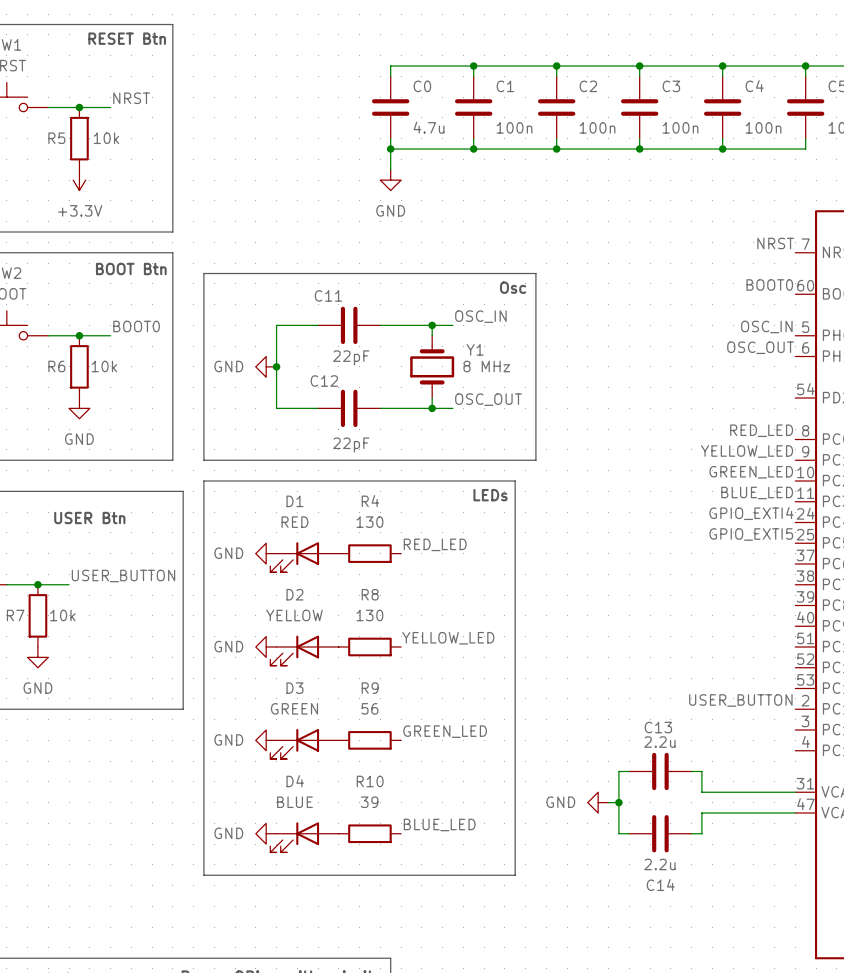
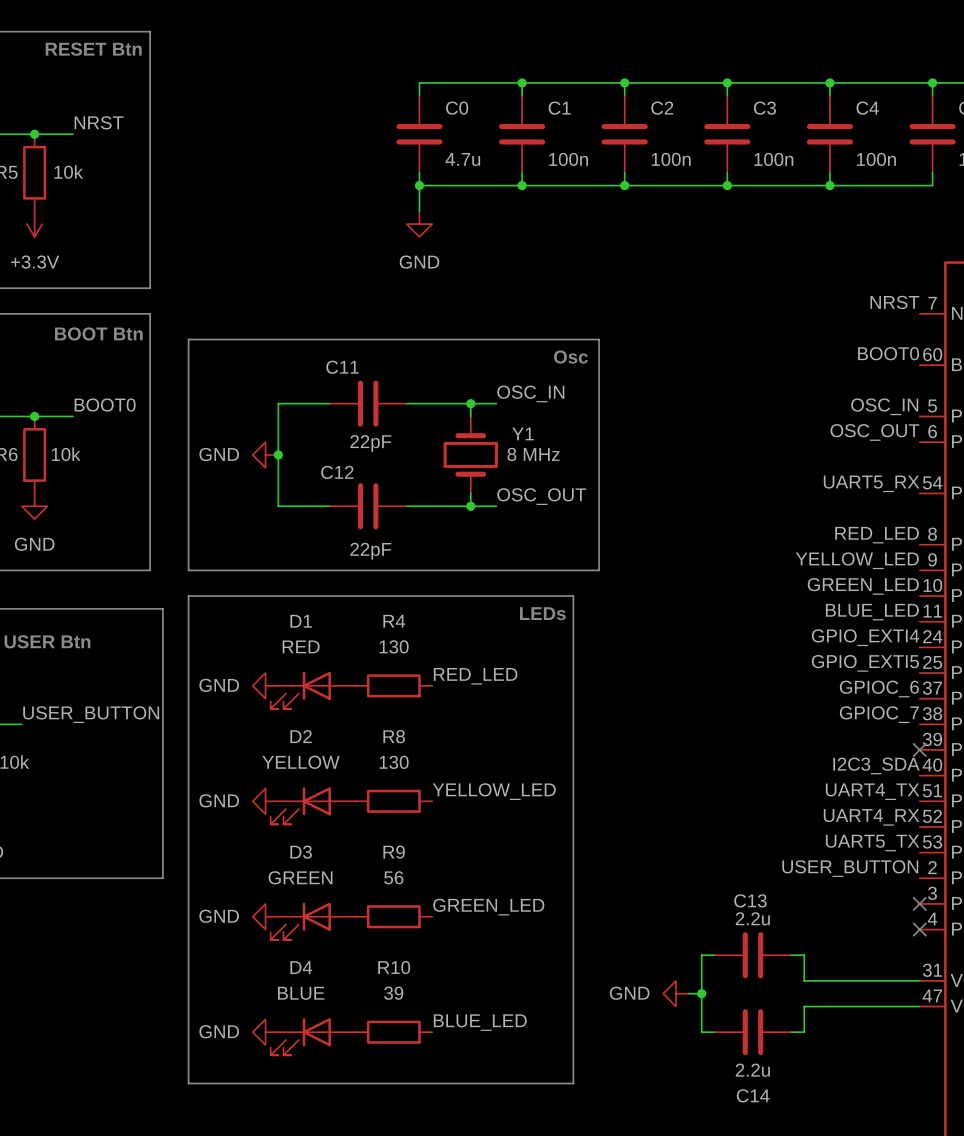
label: none -> UART5_RX (871, 483)
label: none -> GPIOC_6 (879, 688)
label: none -> GPIOC_7 (879, 714)
no-connect mark: none -> (919, 749)
label: none -> I2C3_SDA (876, 765)
label: none -> UART4_TX (872, 791)
label: none -> UART4_RX (871, 817)
label: none -> UART5_TX (872, 843)
no-connect mark: none -> (919, 903)
no-connect mark: none -> (919, 929)

